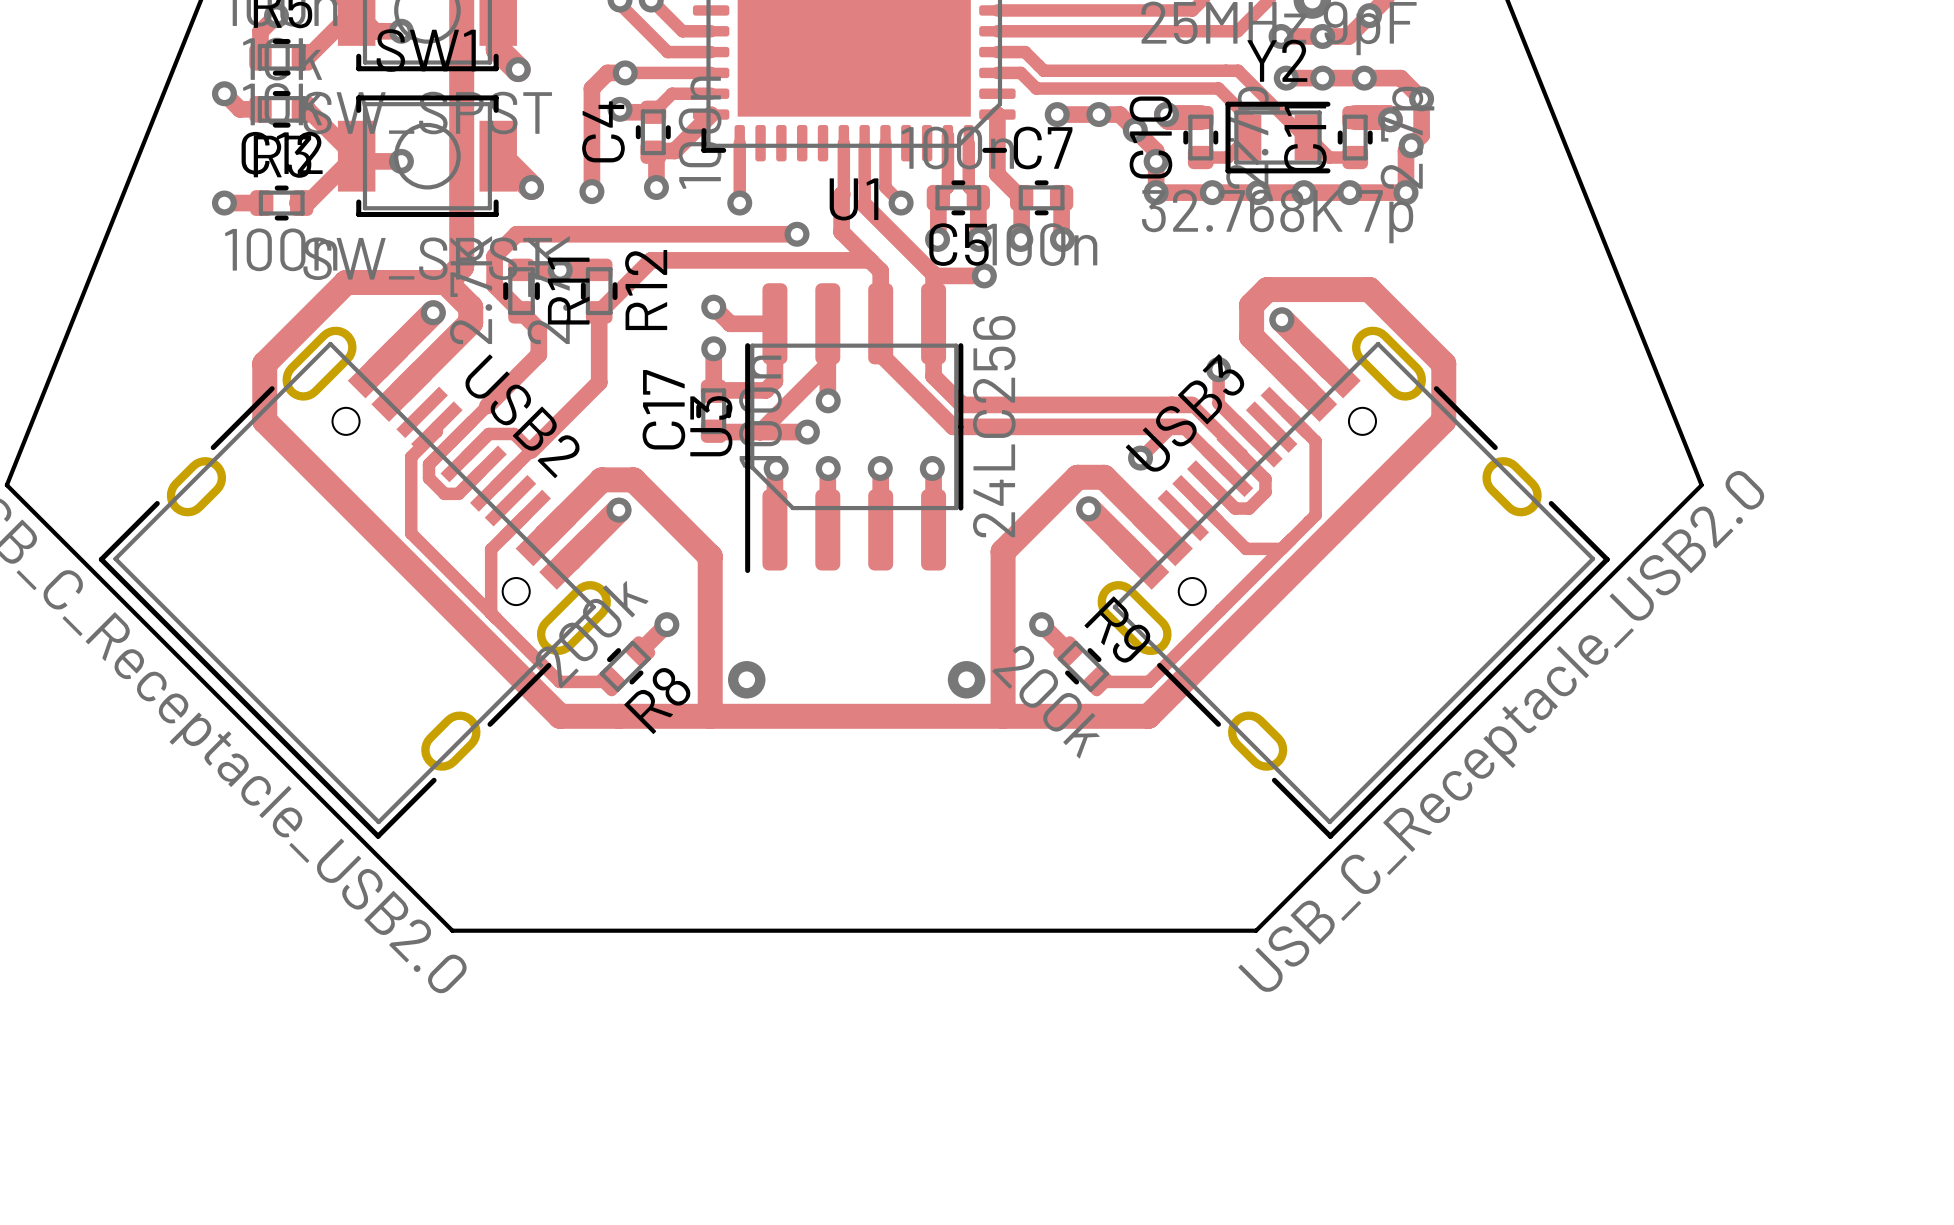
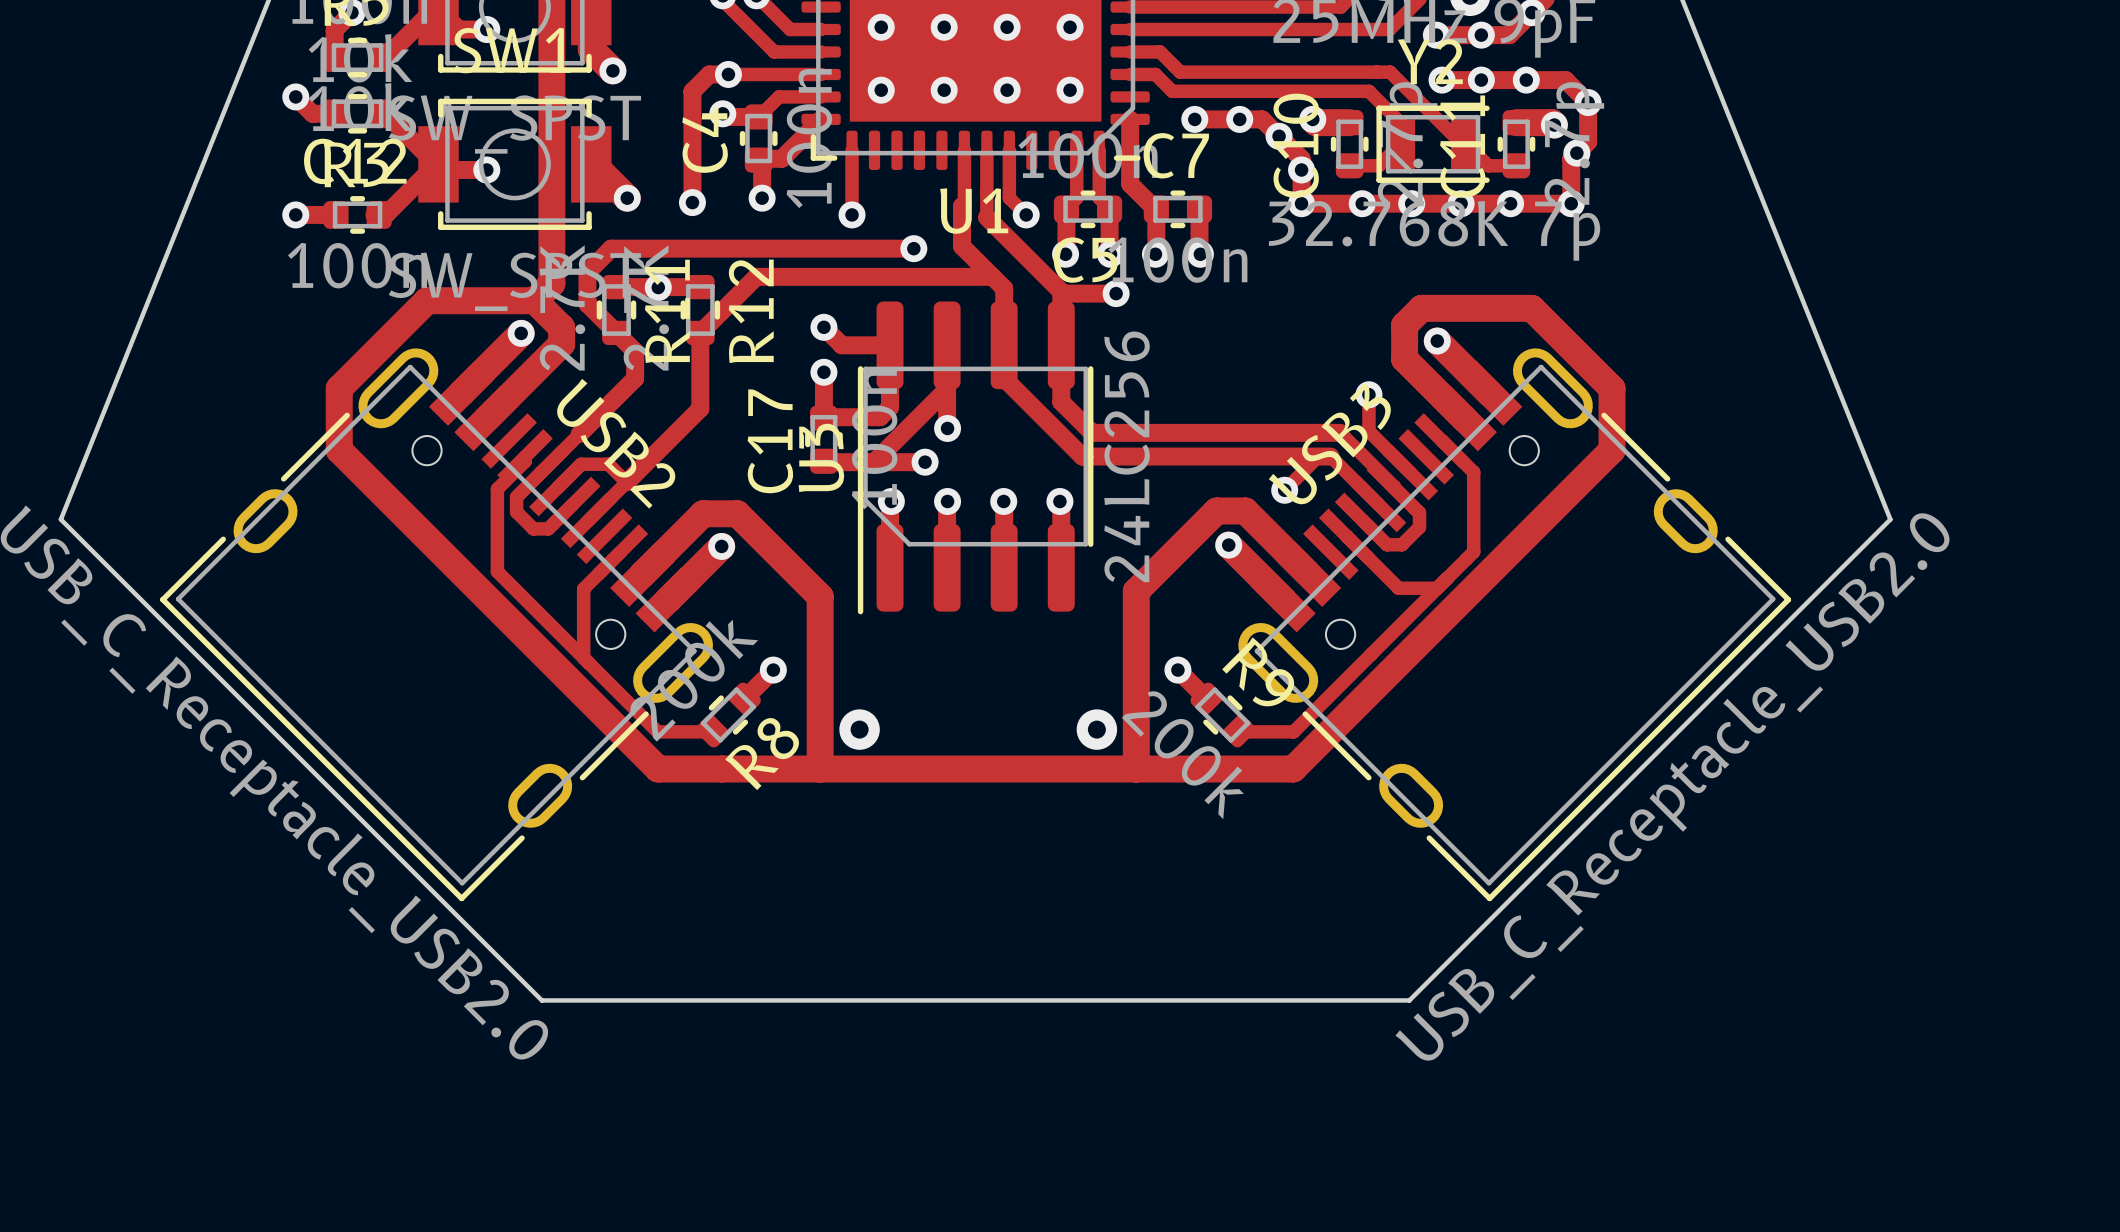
via: none -> (881, 27)
via: none -> (944, 27)
via: none -> (1007, 27)
via: none -> (1070, 27)
via: none -> (881, 90)
via: none -> (944, 90)
via: none -> (1007, 90)
via: none -> (1070, 90)

